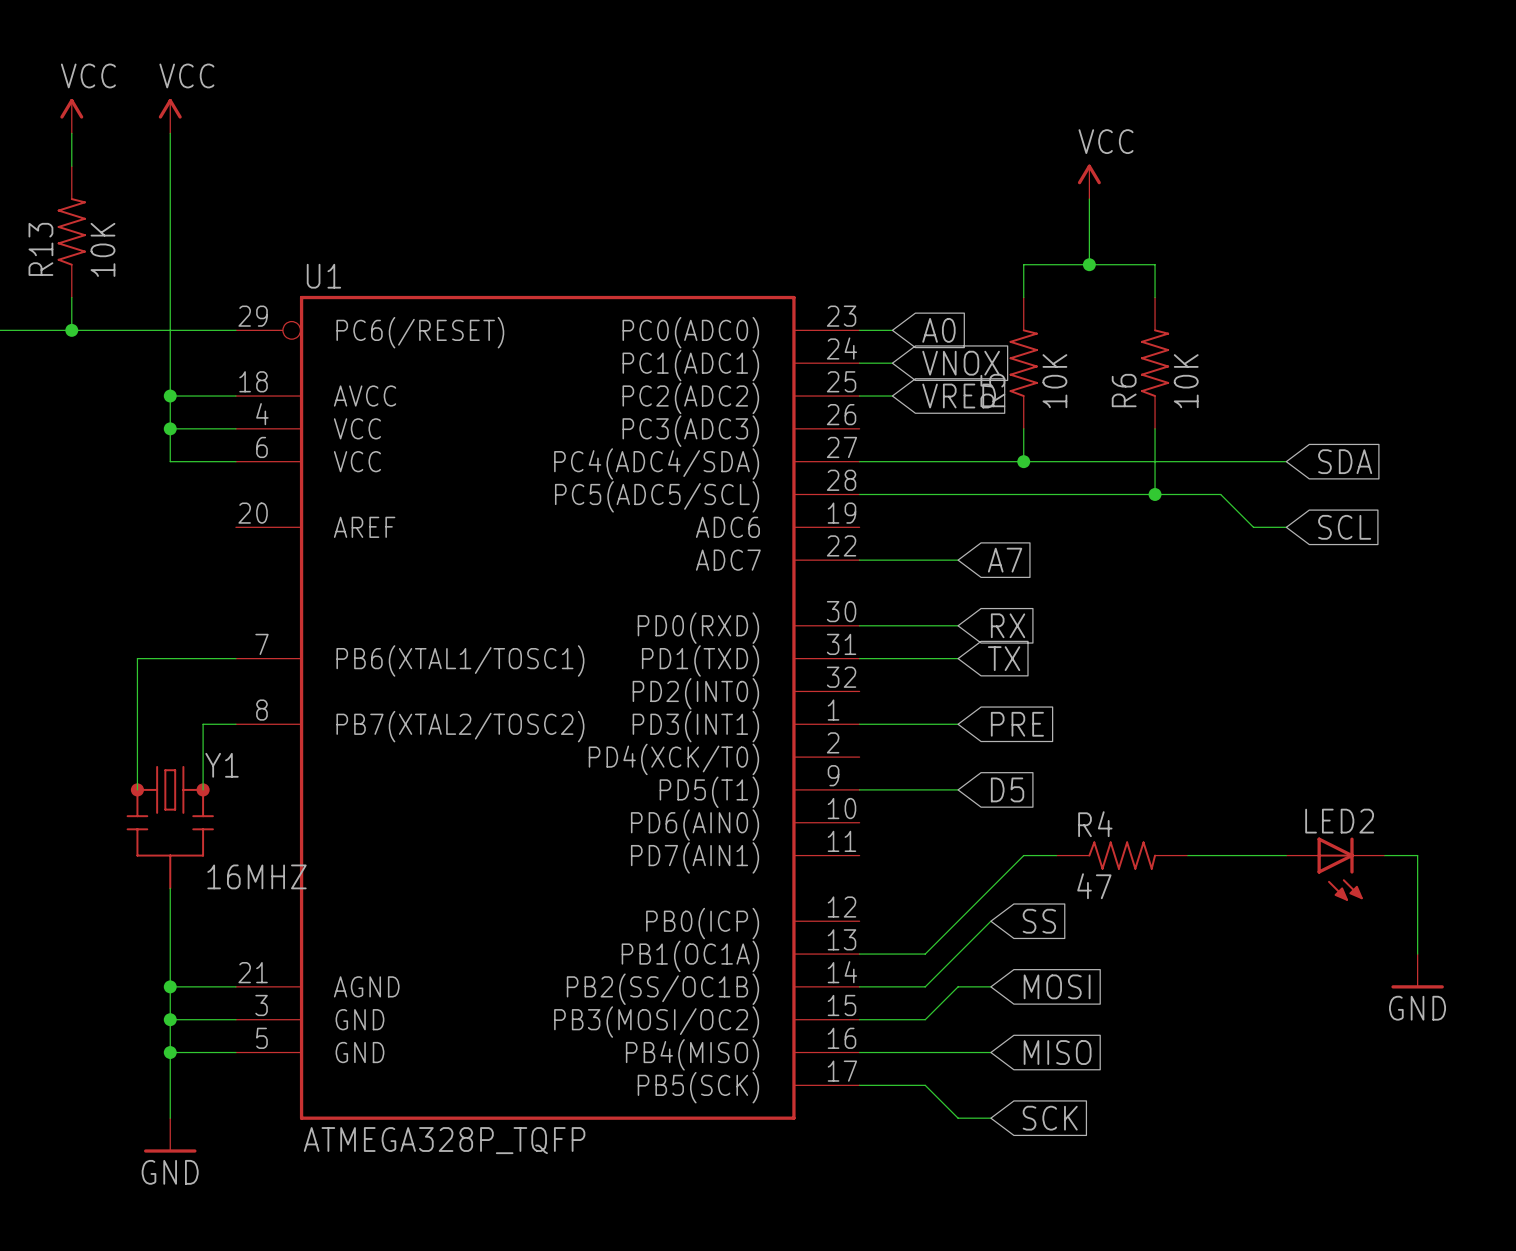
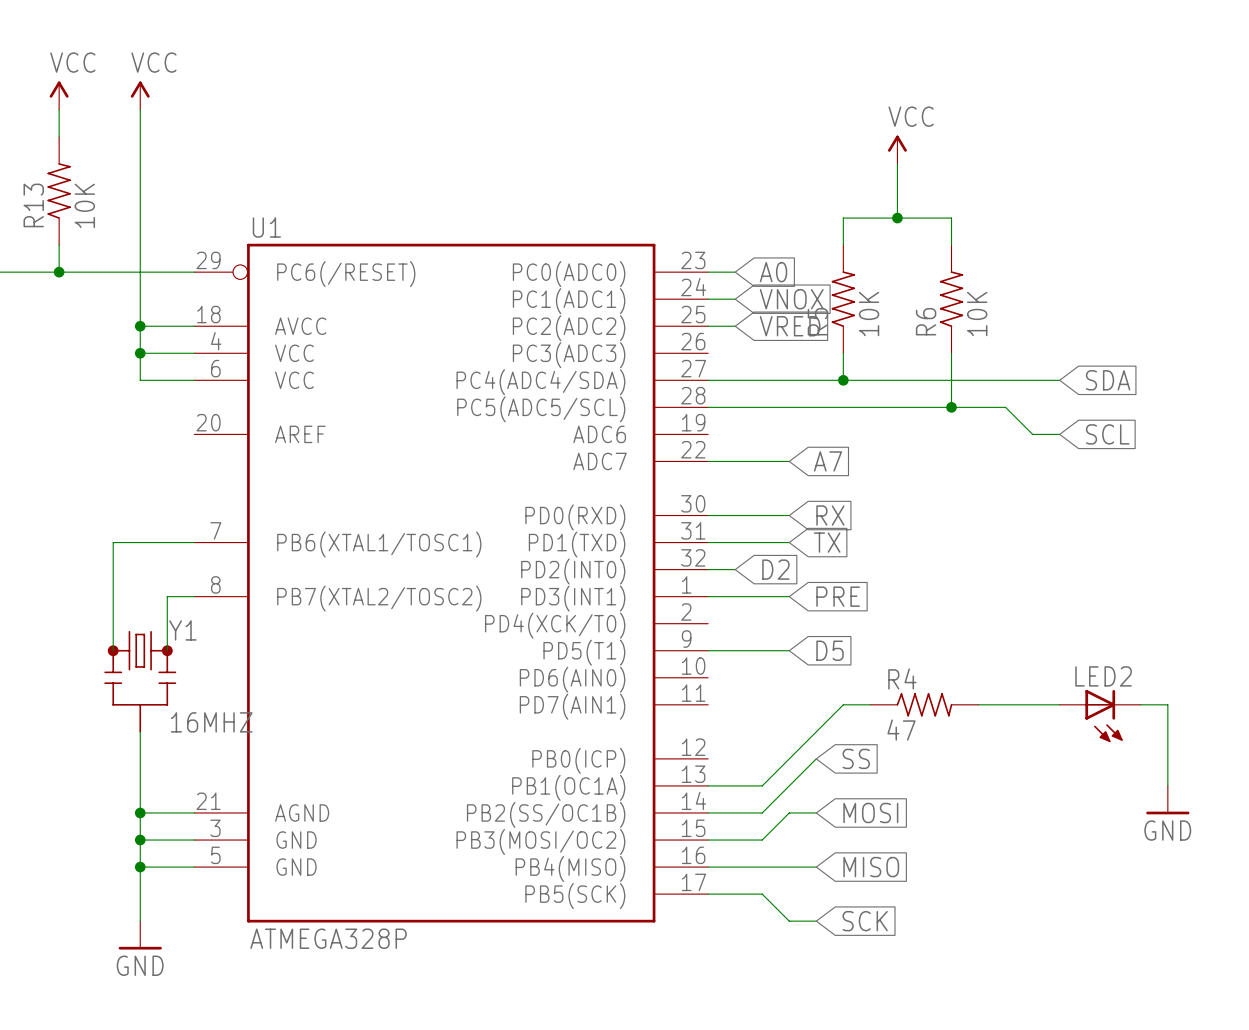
wire: none -> (708, 569) (735, 569)
global label: none -> D2 (775, 569)
U1 value: ATMEGA328P_TQFP (444, 1140) -> ATMEGA328P (328, 938)

